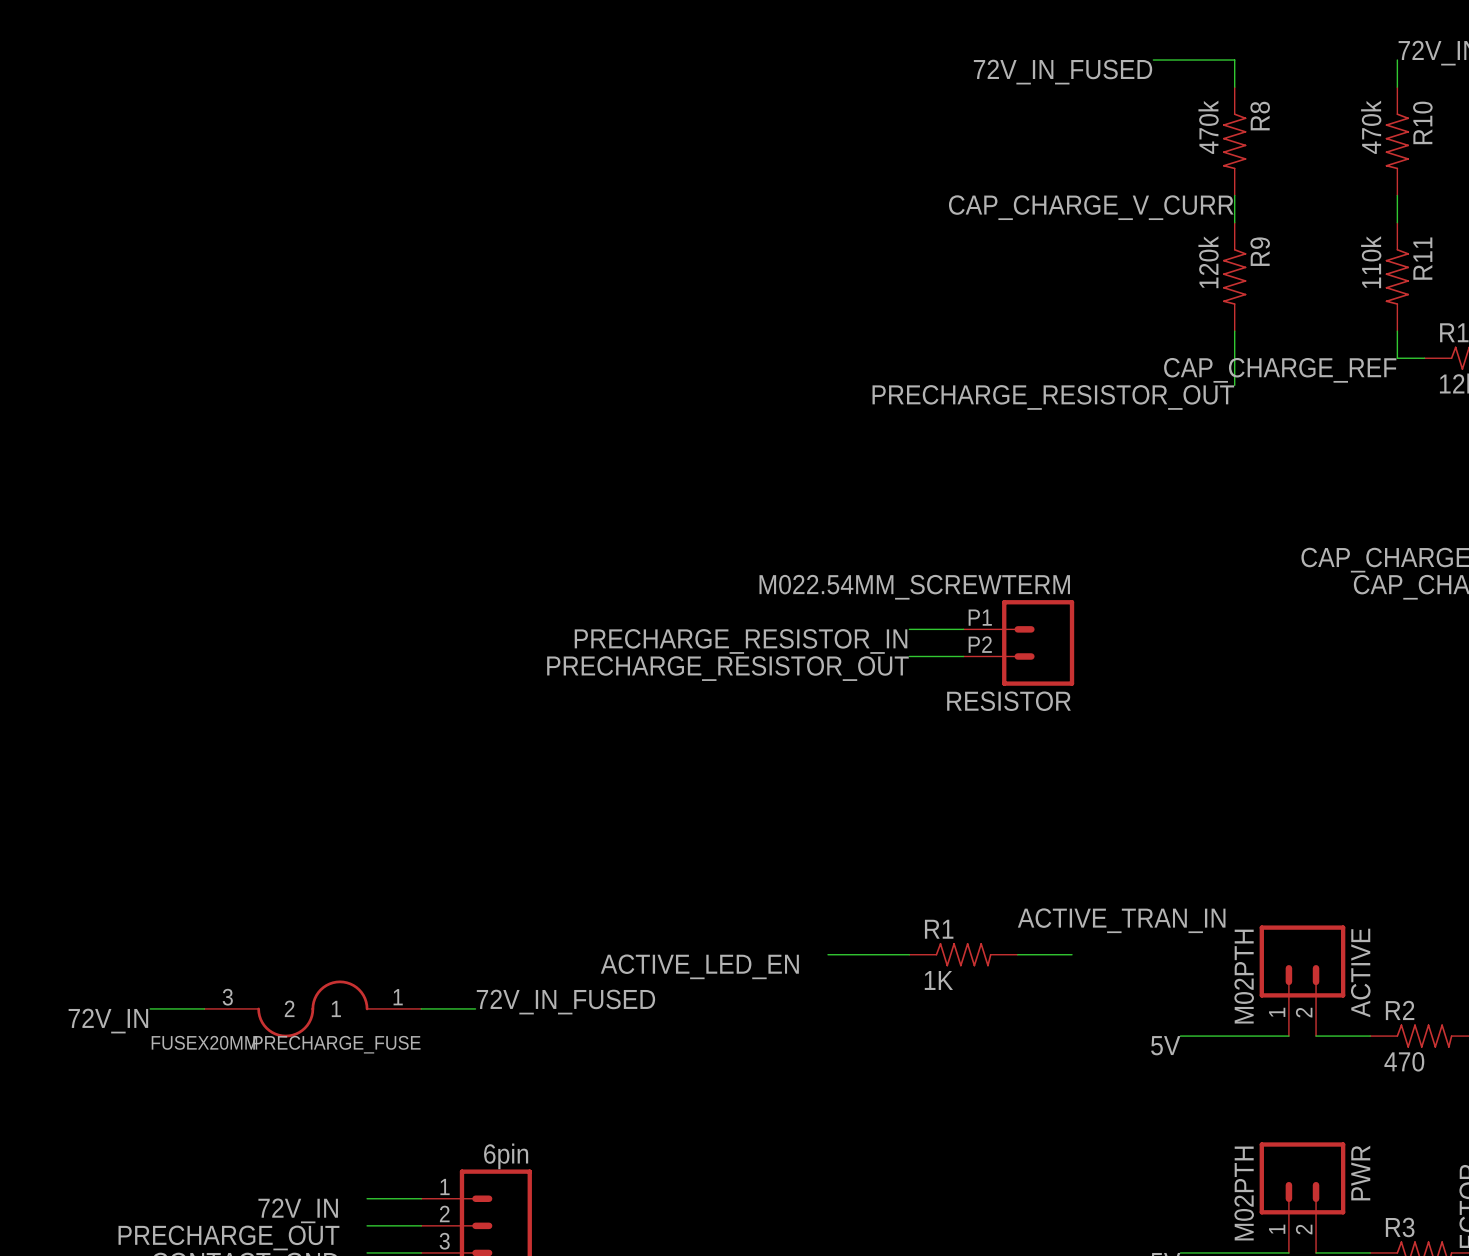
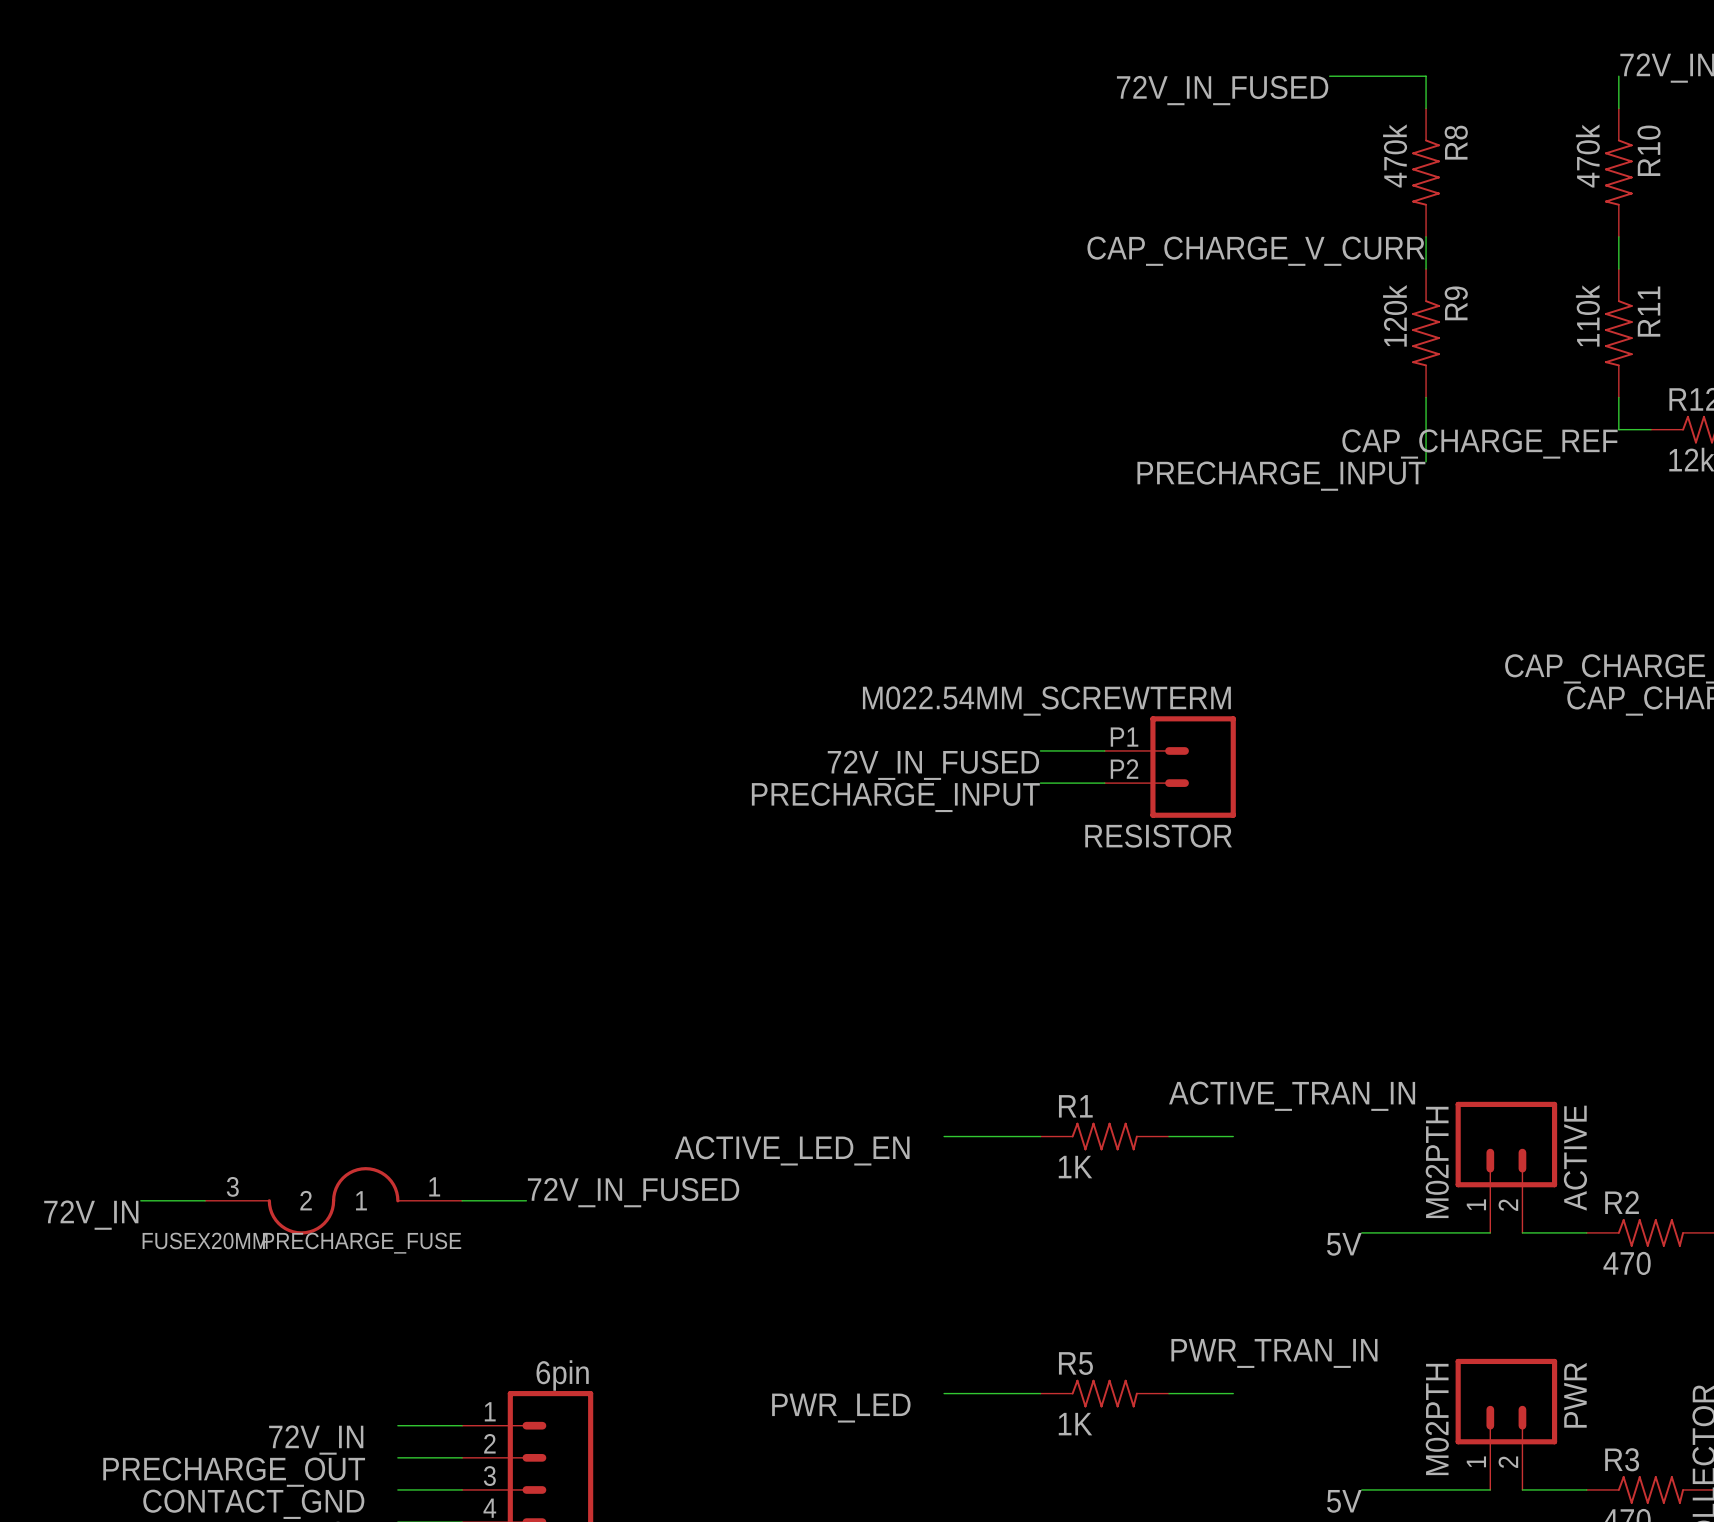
label: PRECHARGE_RESISTOR_OUT (1053, 397) -> PRECHARGE_INPUT (1281, 476)
label: PRECHARGE_RESISTOR_IN (741, 641) -> 72V_IN_FUSED (933, 765)
label: PRECHARGE_RESISTOR_OUT (727, 668) -> PRECHARGE_INPUT (895, 797)
label: none -> PWR_TRAN_IN (1274, 1353)
wire: none -> (944, 1393) (1040, 1393)
R5: none -> 1K (1104, 1393)
wire: none -> (1169, 1393) (1233, 1393)
label: none -> PWR_LED (841, 1408)

